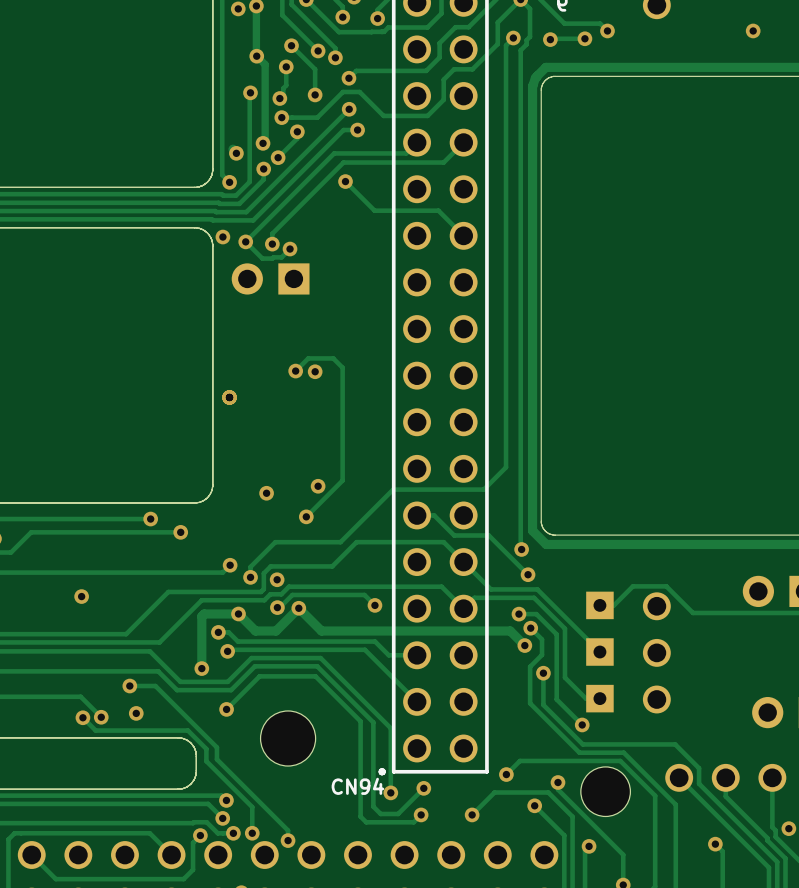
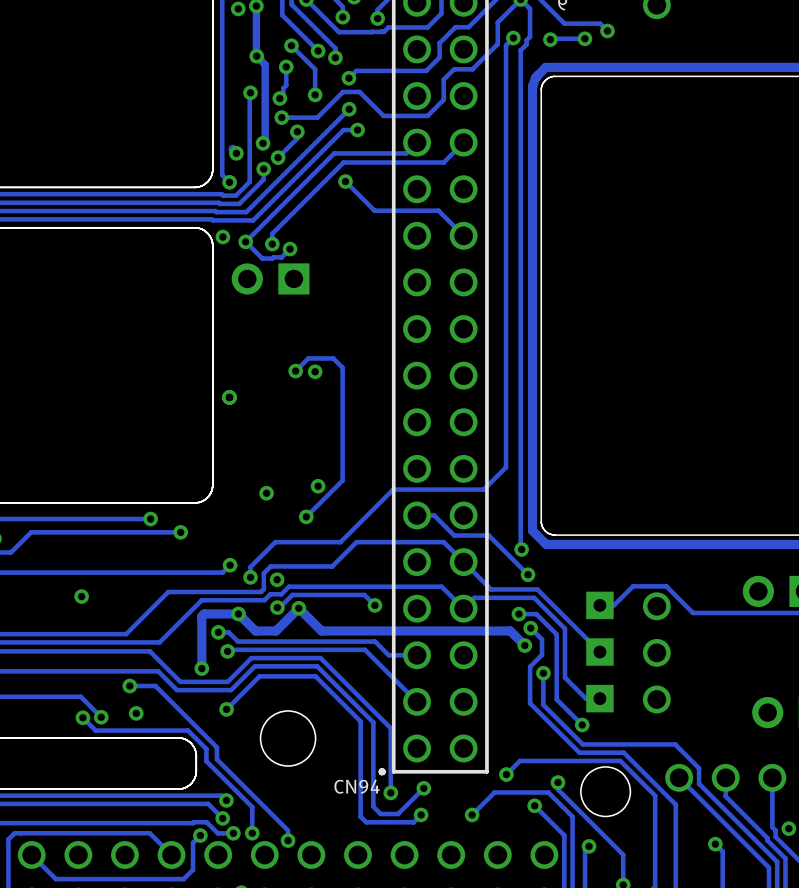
via: (753, 30) -> none

